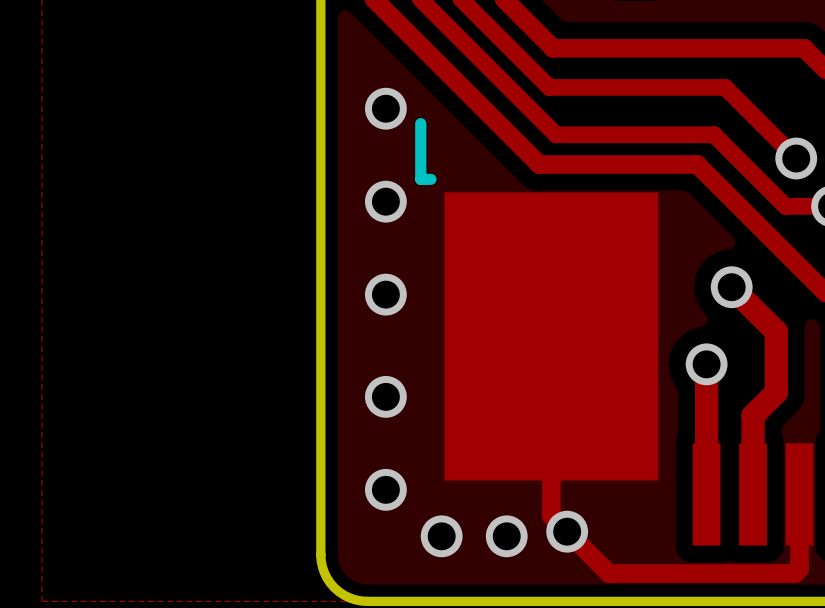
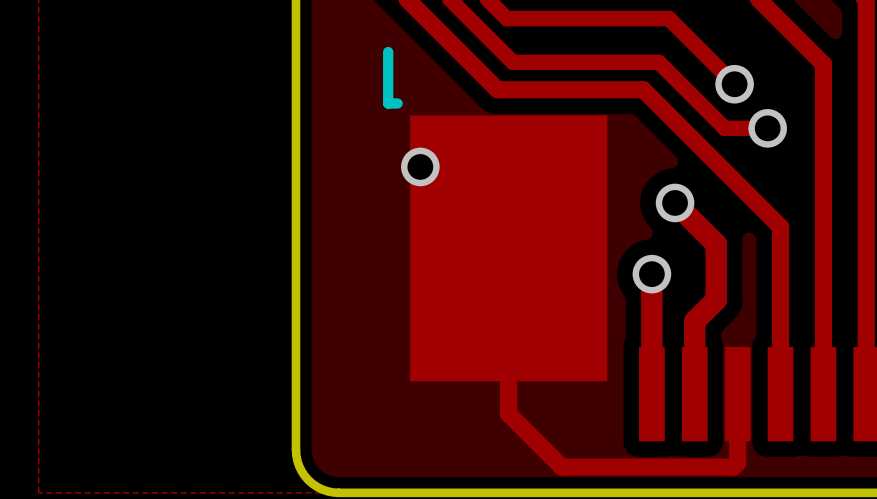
via: (385, 108) -> none
via: (385, 201) -> none
via: none -> (420, 166)
via: (385, 294) -> none
via: (385, 396) -> none
via: (385, 489) -> none
via: (567, 531) -> none
via: (441, 536) -> none
via: (506, 536) -> none

